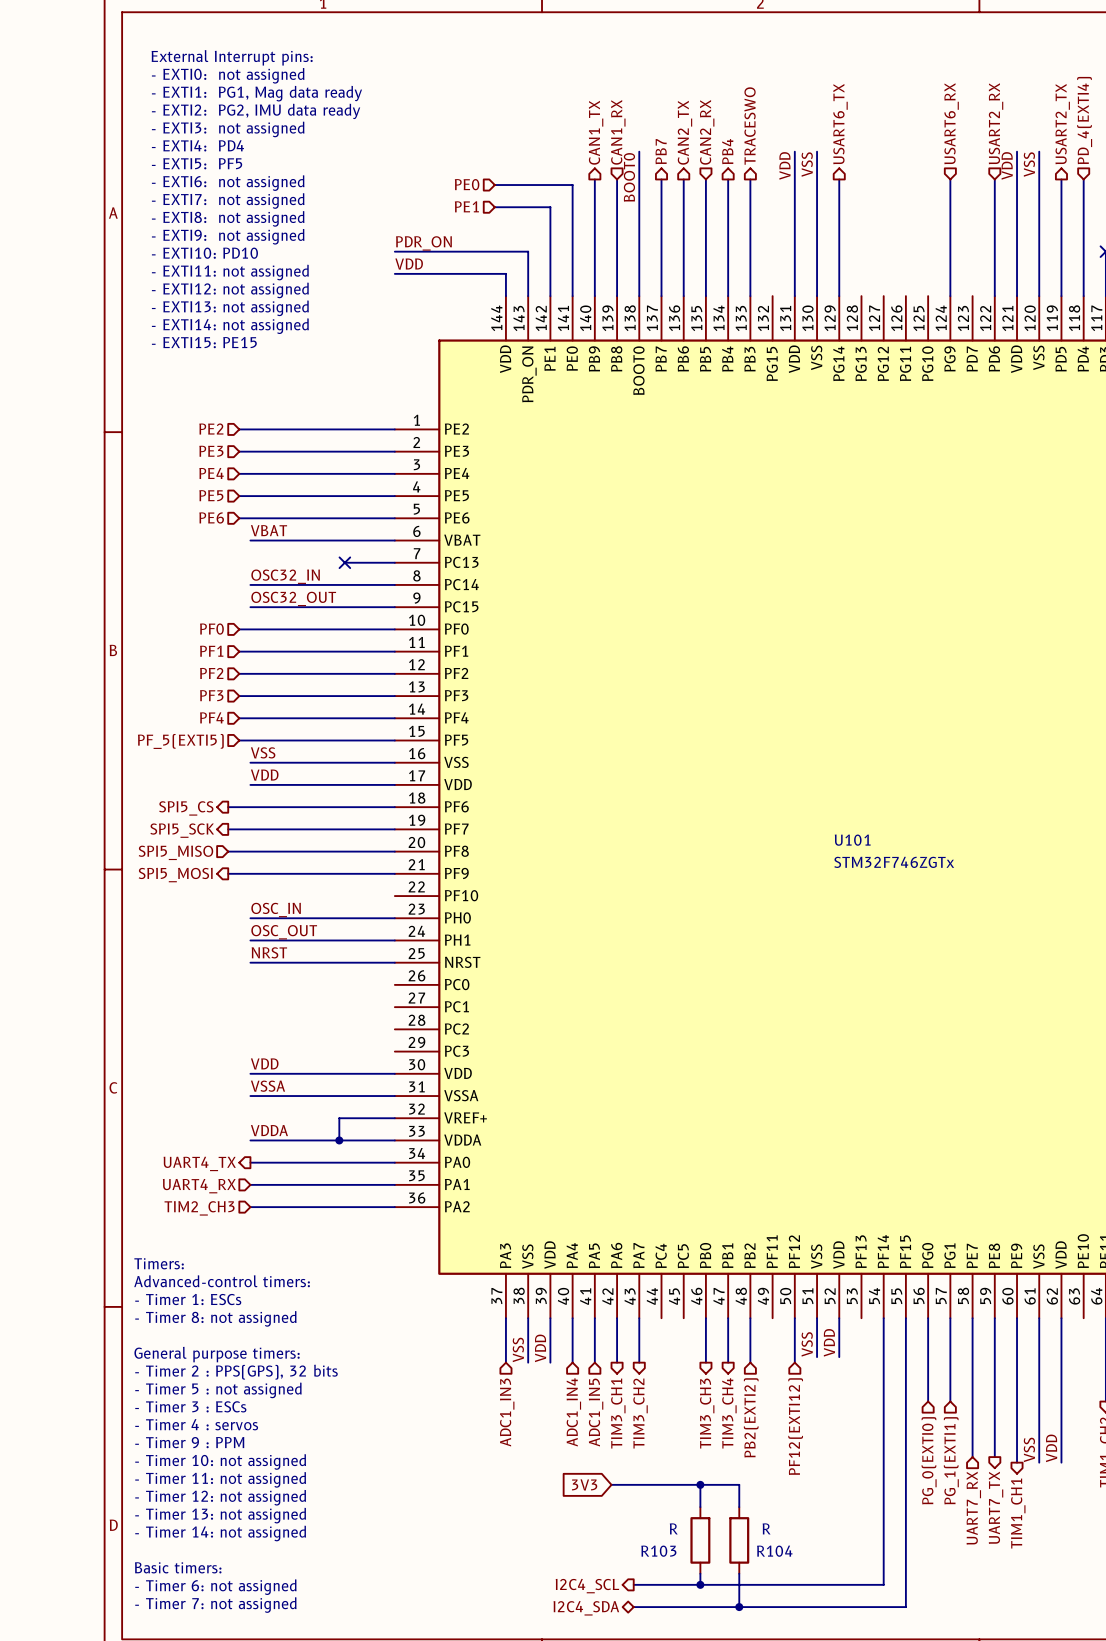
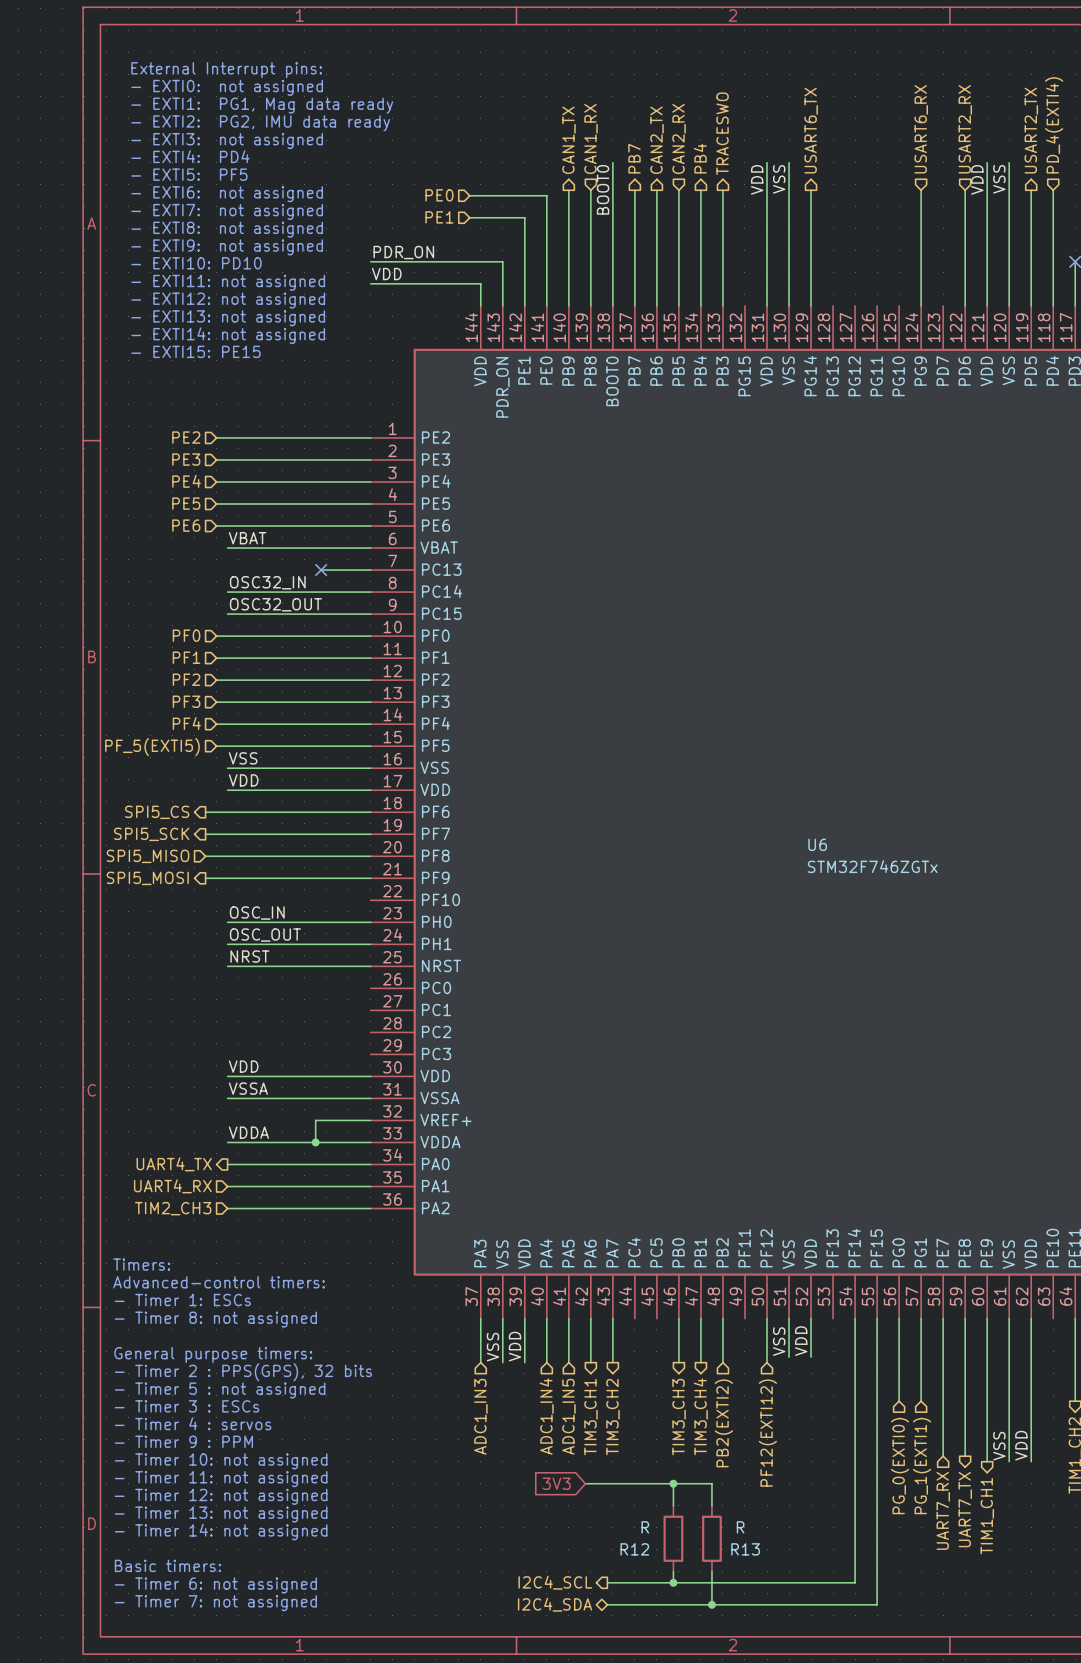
U101 name: U101 (852, 840) -> U6 (817, 844)
R103 name: R103 (658, 1551) -> R12 (634, 1549)
R104 name: R104 (774, 1551) -> R13 (745, 1549)

